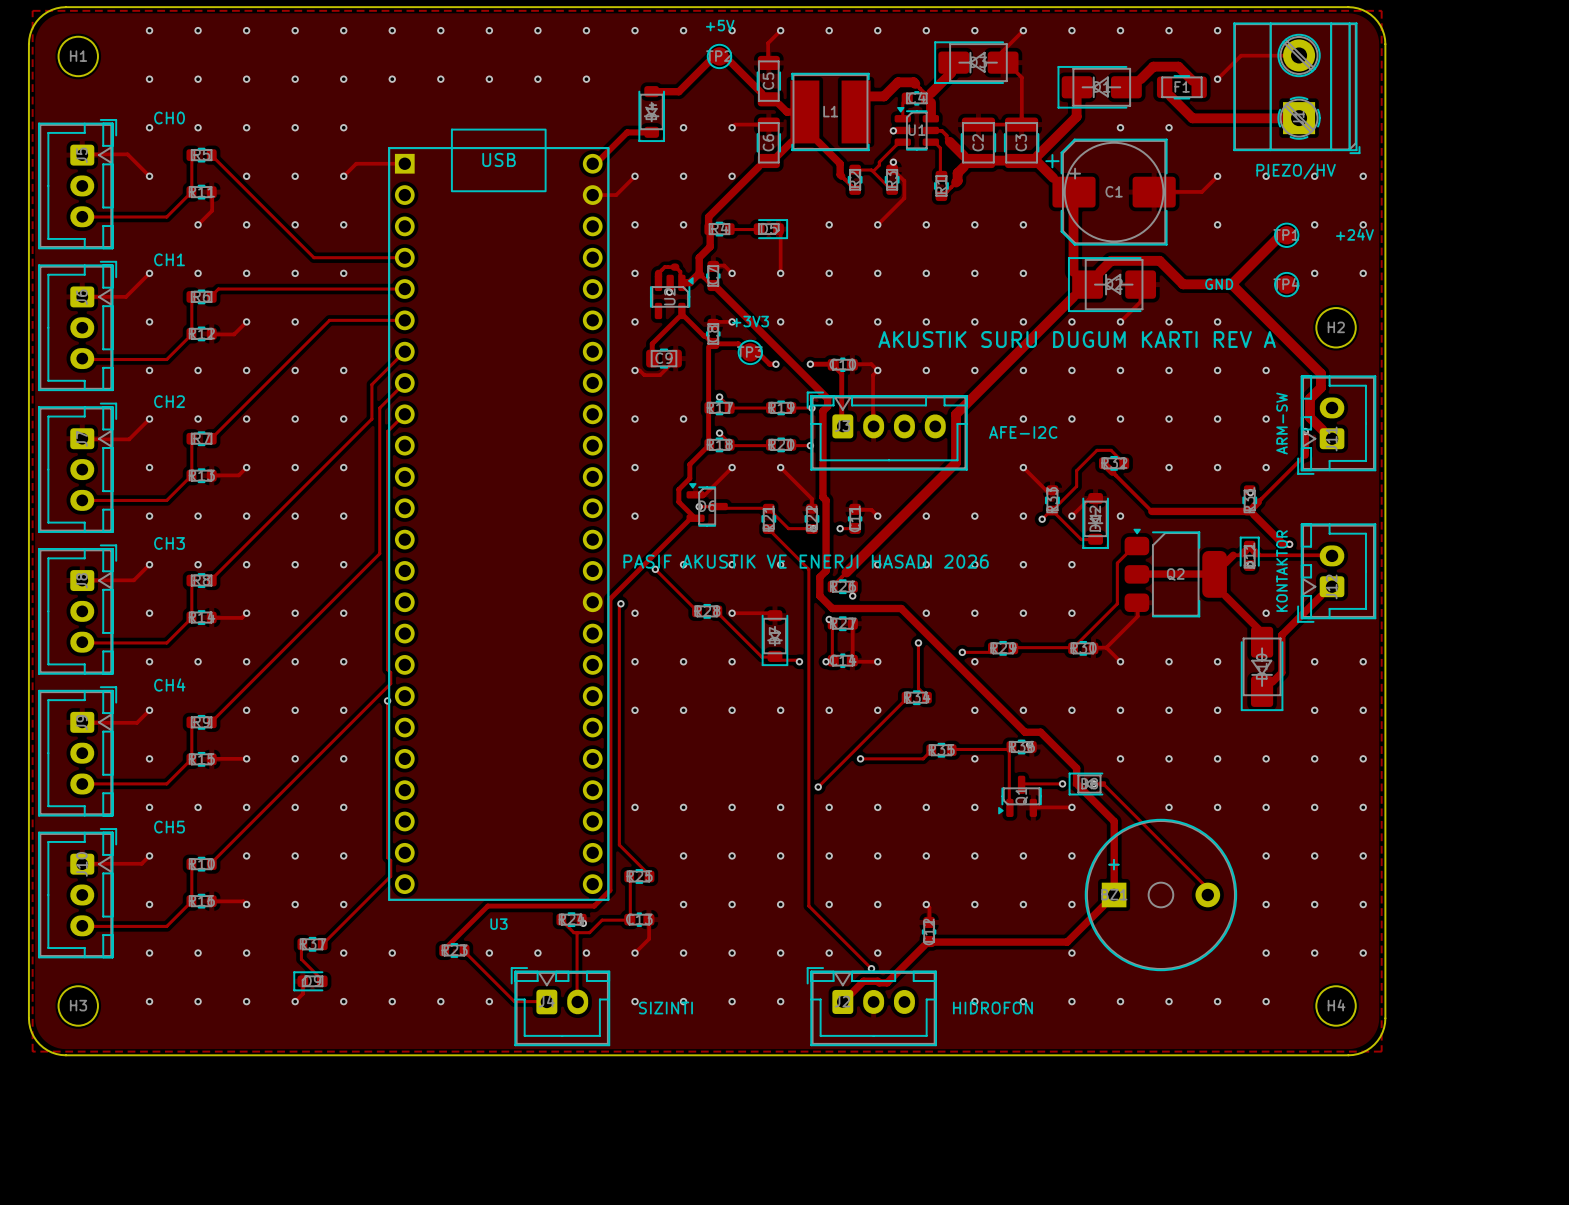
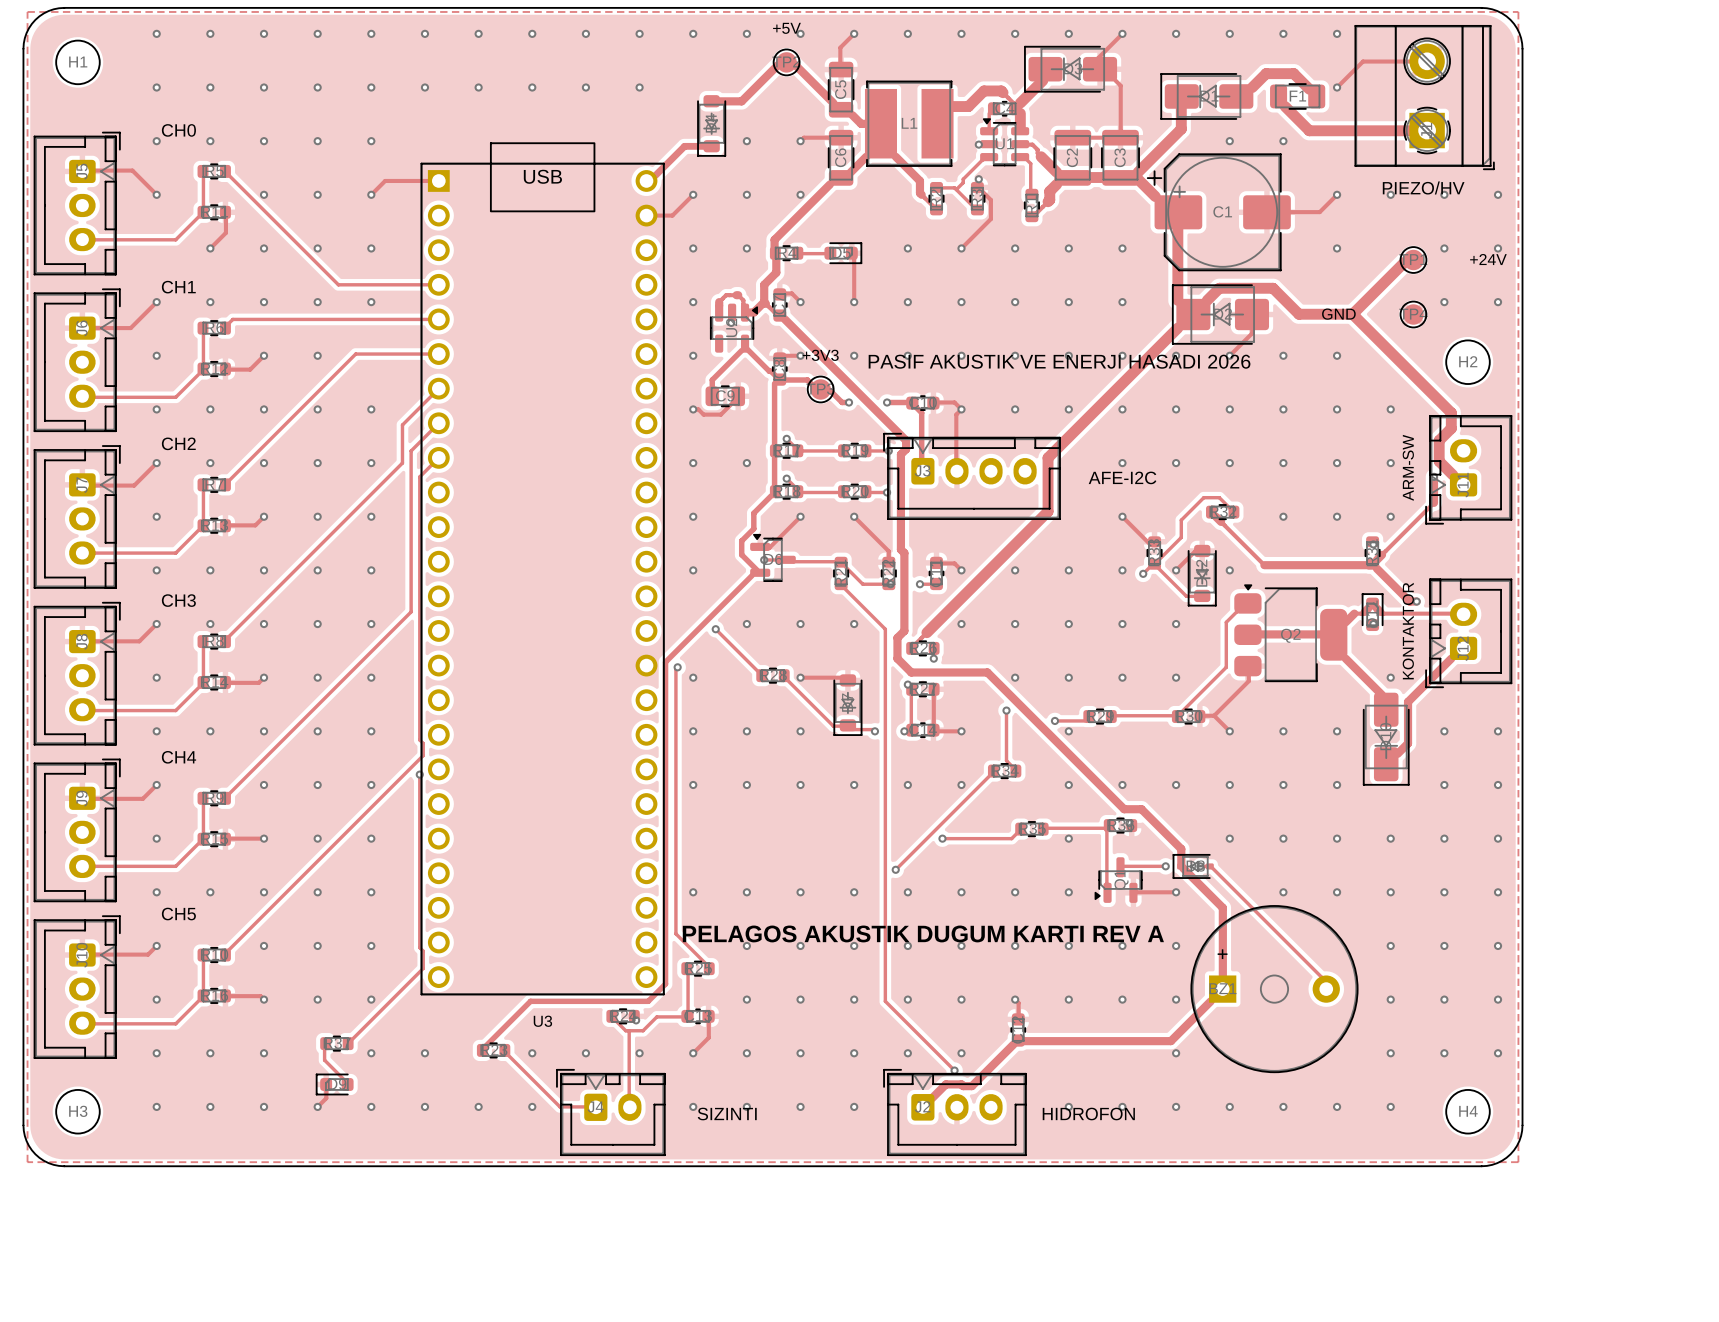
text: AKUSTIK SURU DUGUM KARTI REV A (1077, 339) -> none
text position: PASIF AKUSTIK VE ENERJI HASADI 2026 (806, 561) -> PASIF AKUSTIK VE ENERJI HASADI 2026 (1059, 361)
text: none -> PELAGOS AKUSTIK DUGUM KARTI REV A (923, 933)

